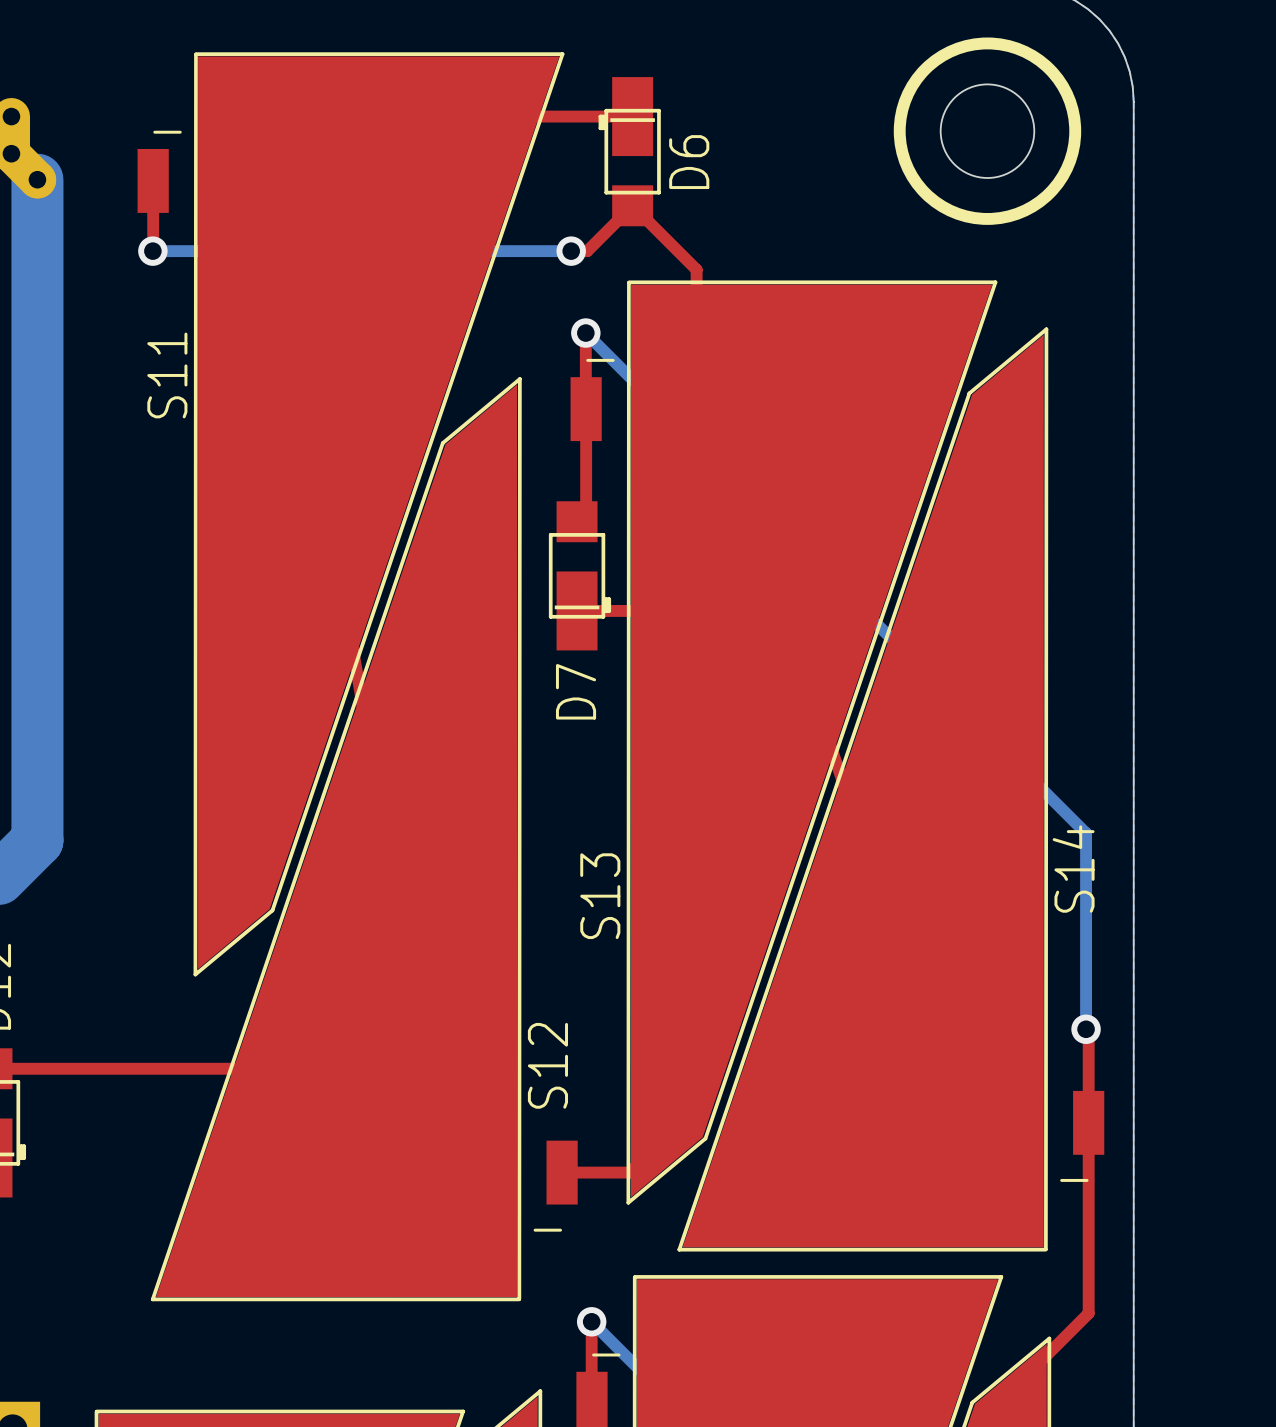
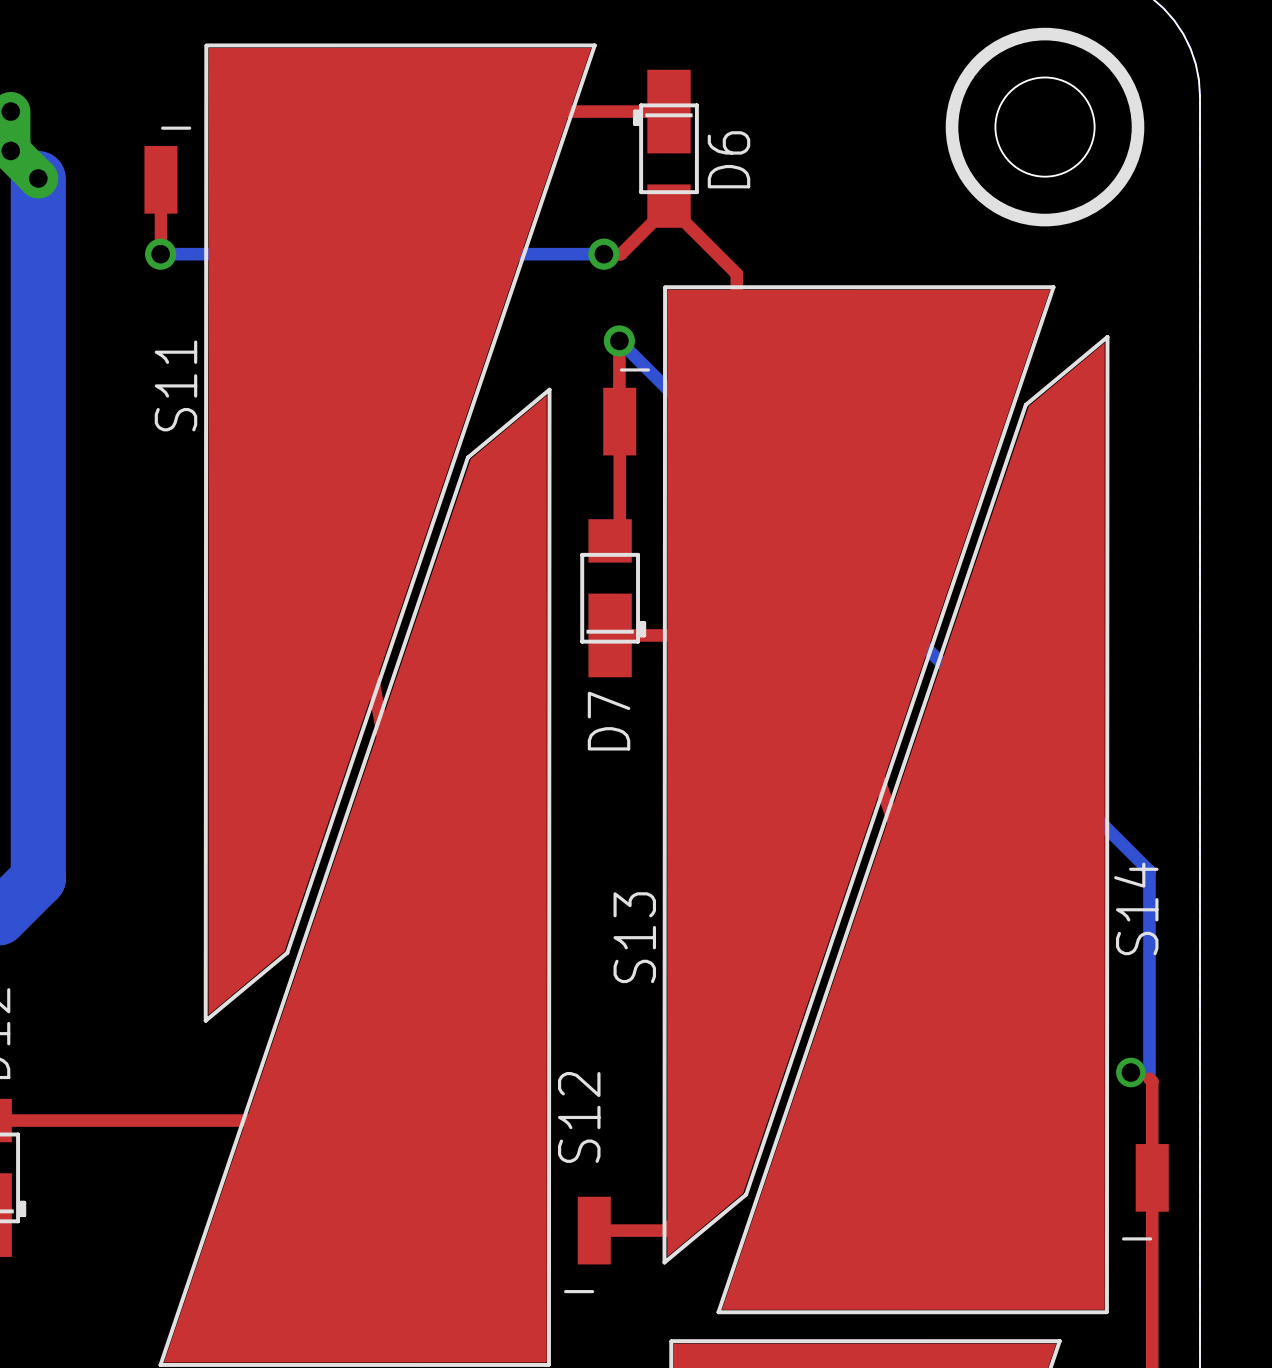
via position: (1086, 1029) -> (1130, 1072)

